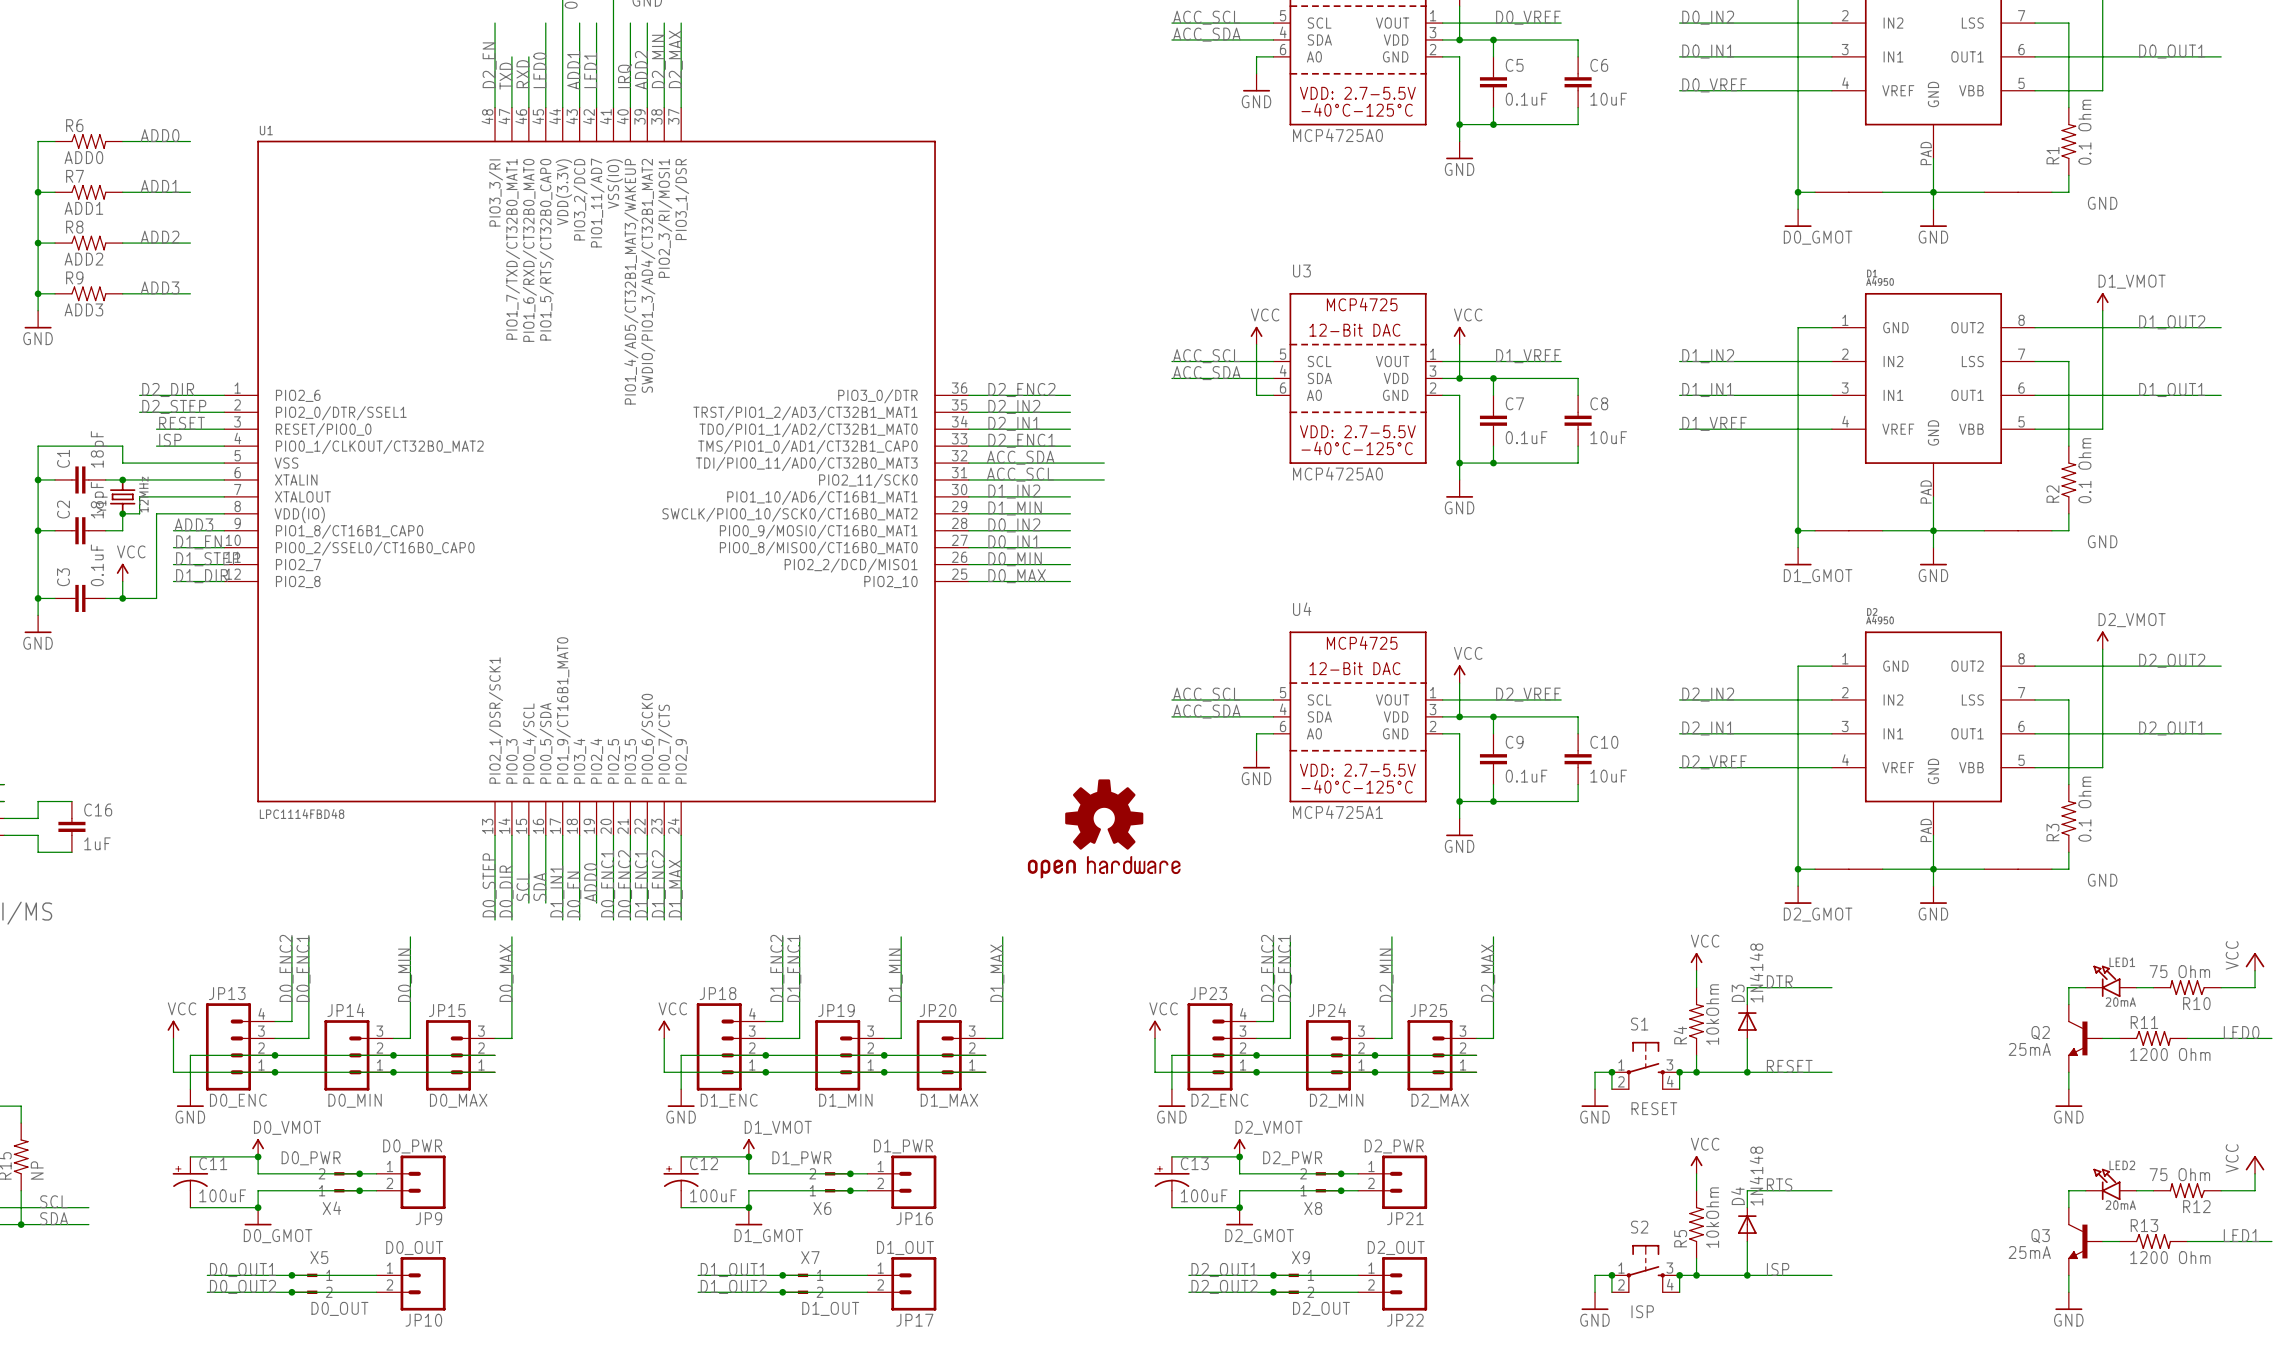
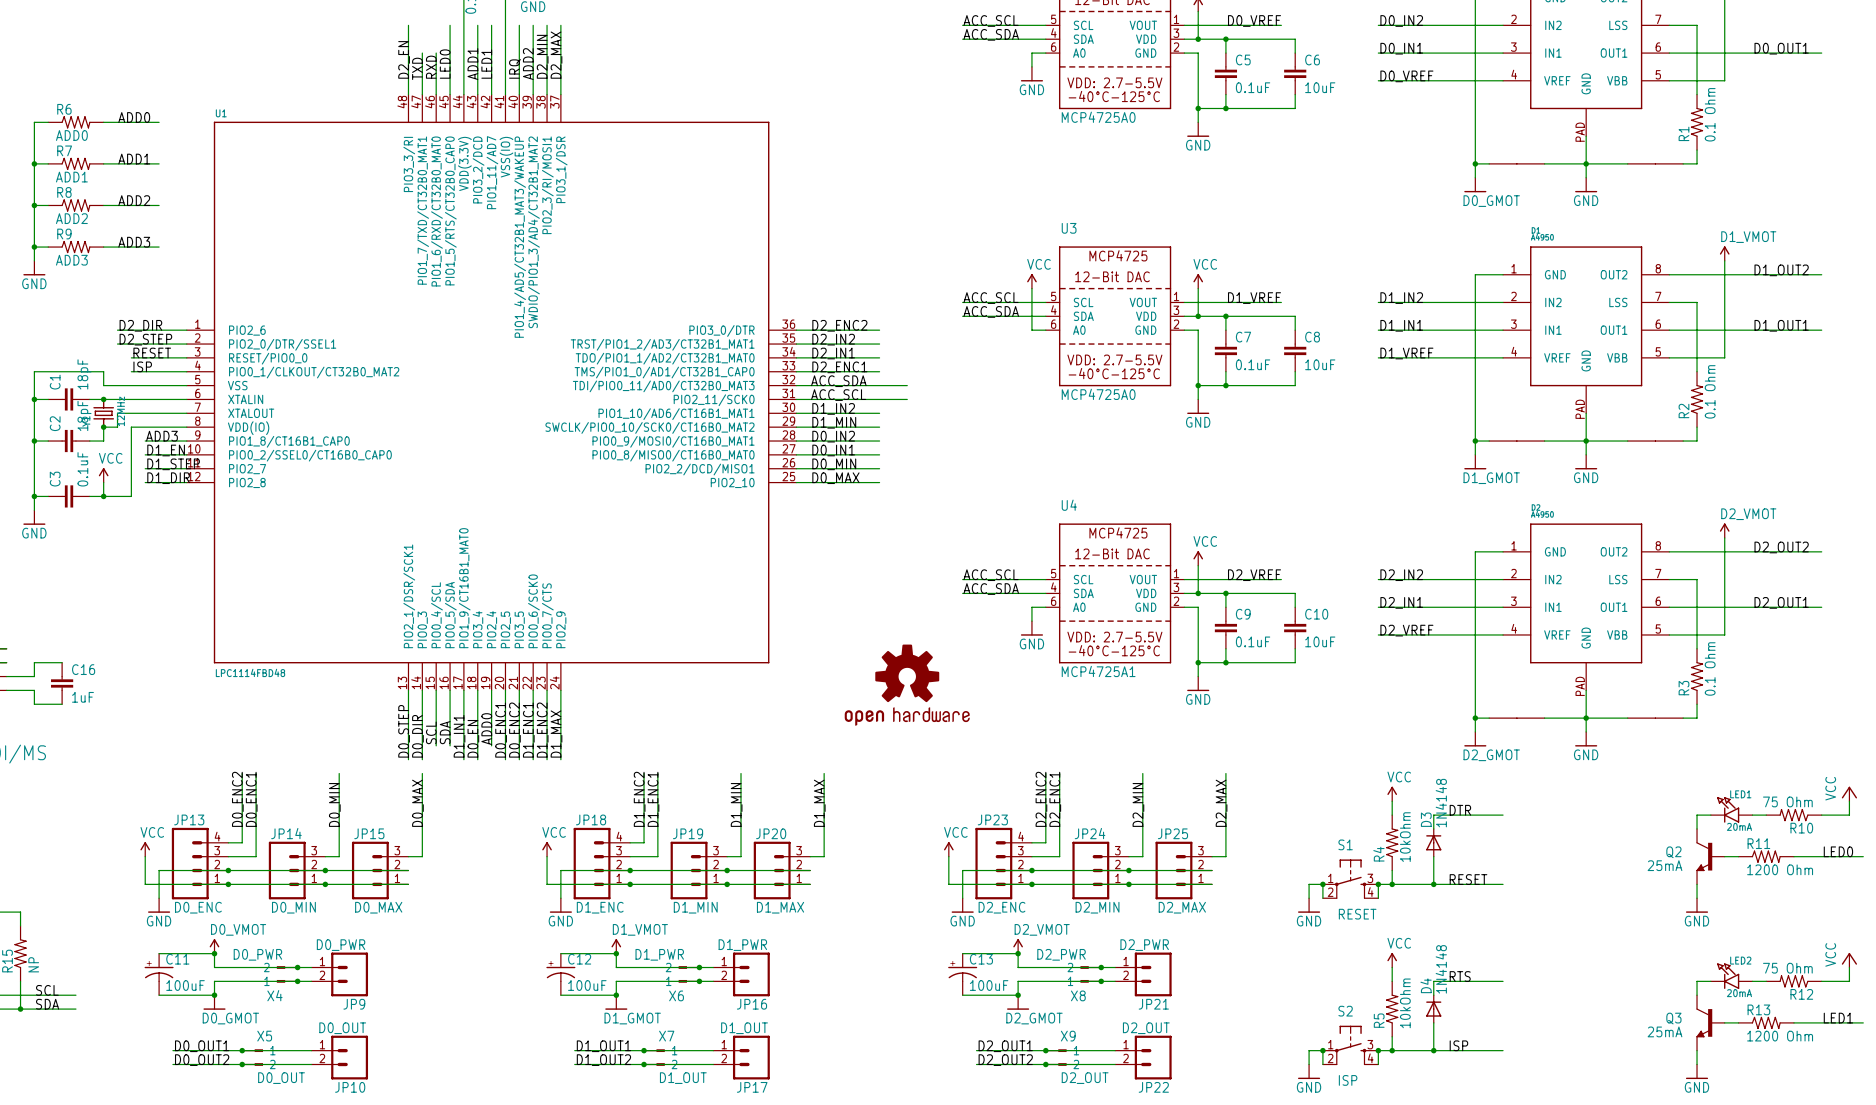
label: GND (2102, 203) -> none
label: GND (2102, 541) -> none
label: GND (2102, 880) -> none

